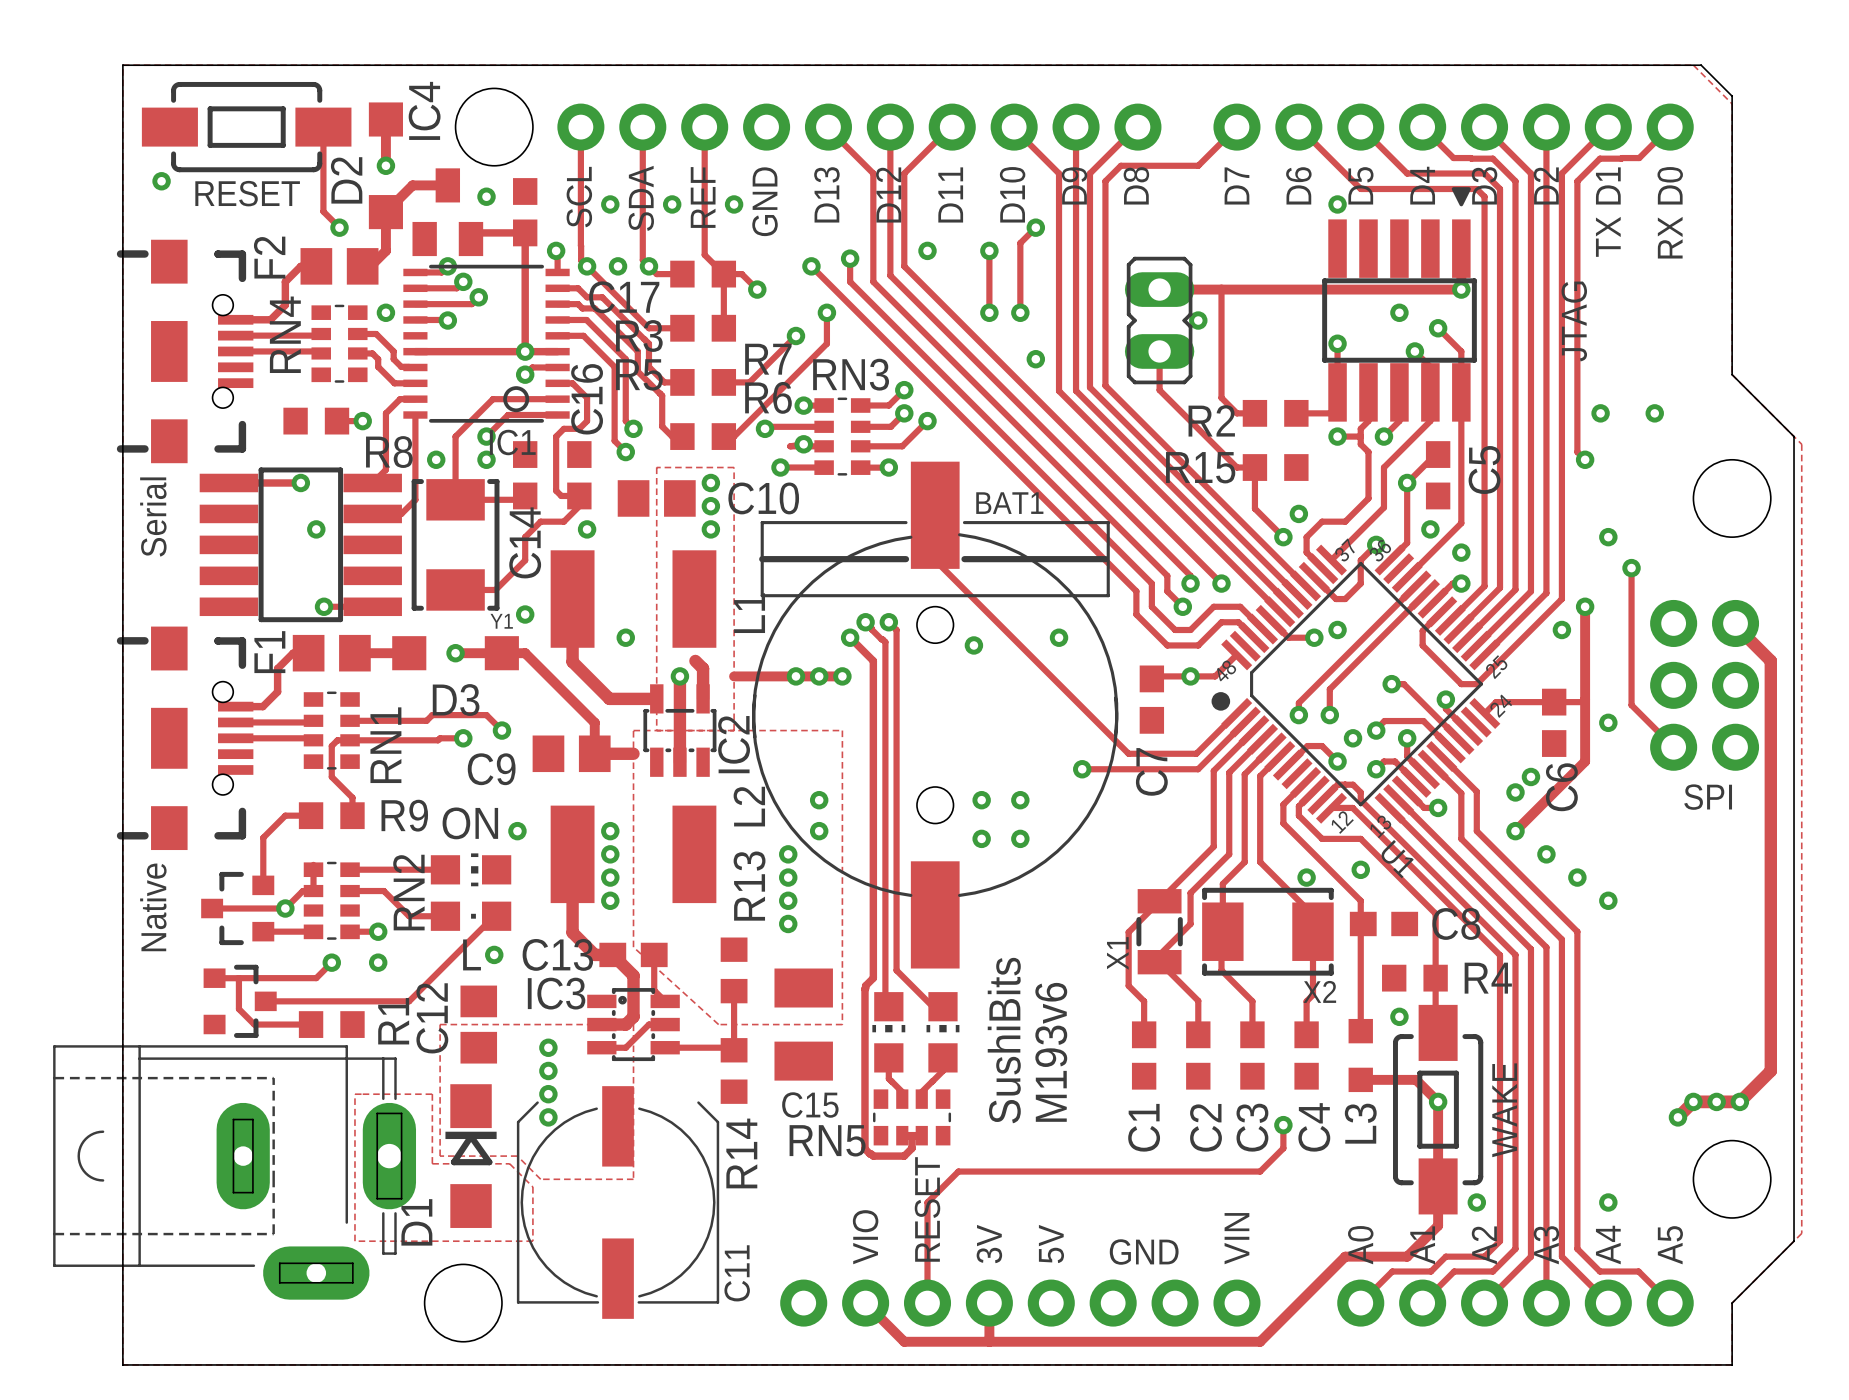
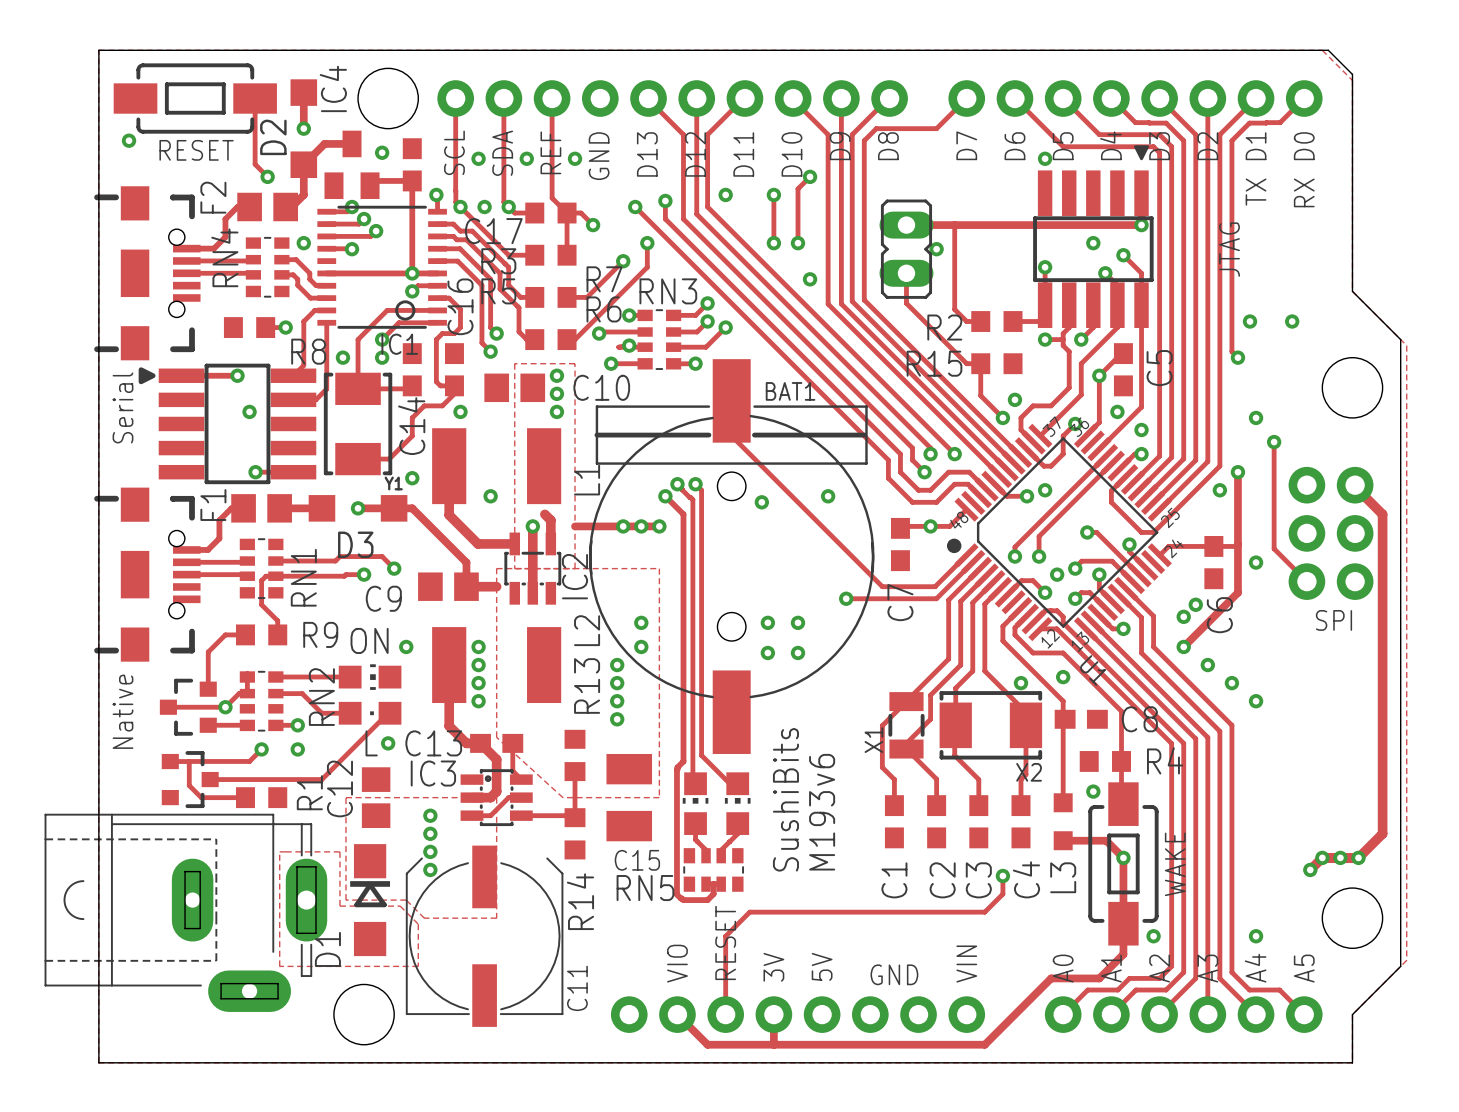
drawing: none -> [138, 367, 156, 385]

